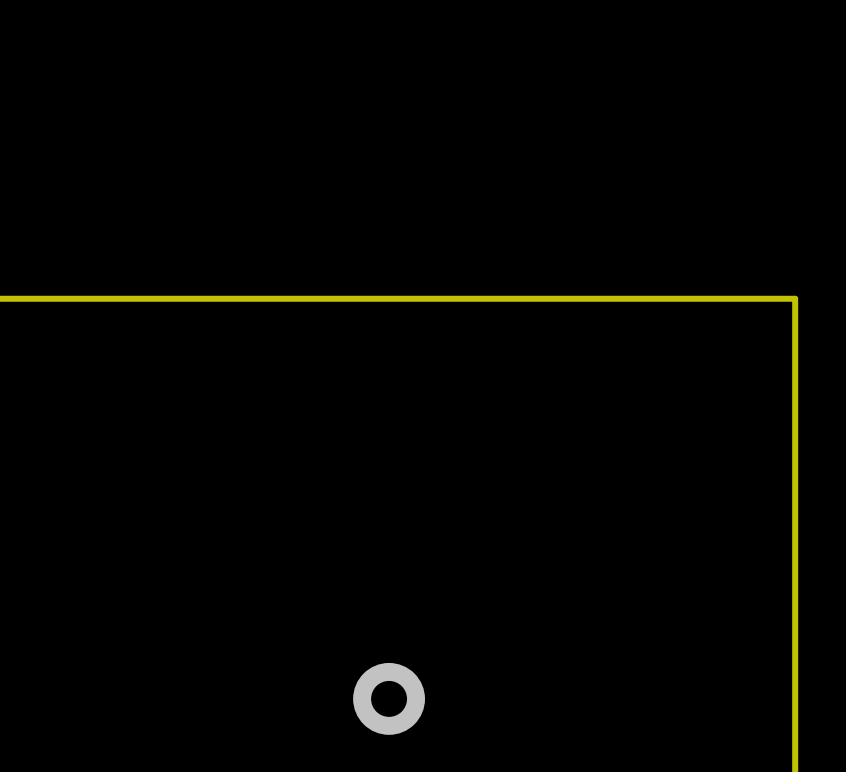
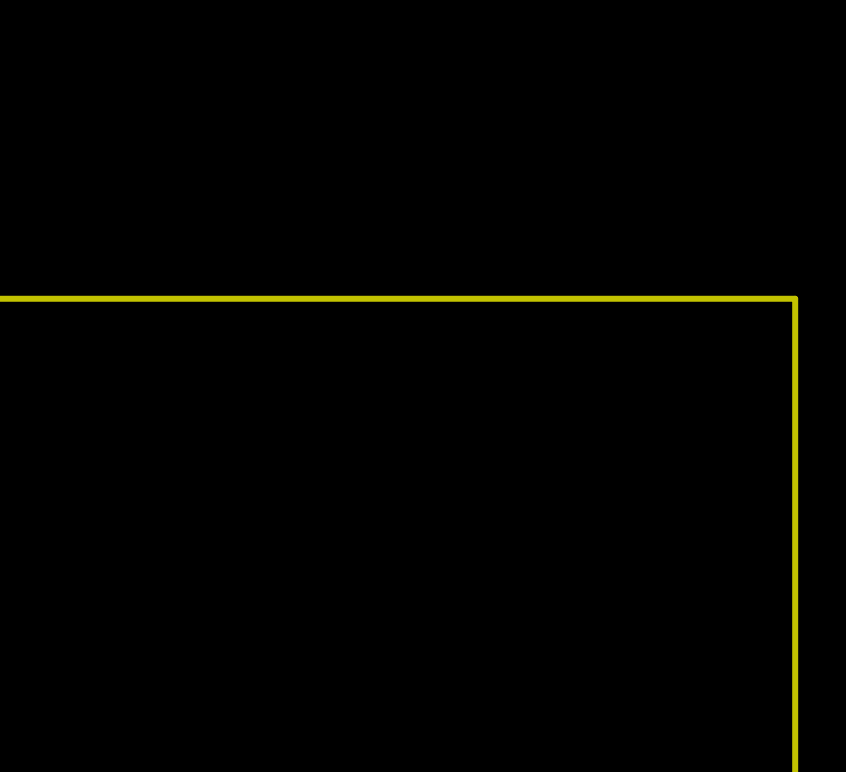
via: (389, 698) -> none

